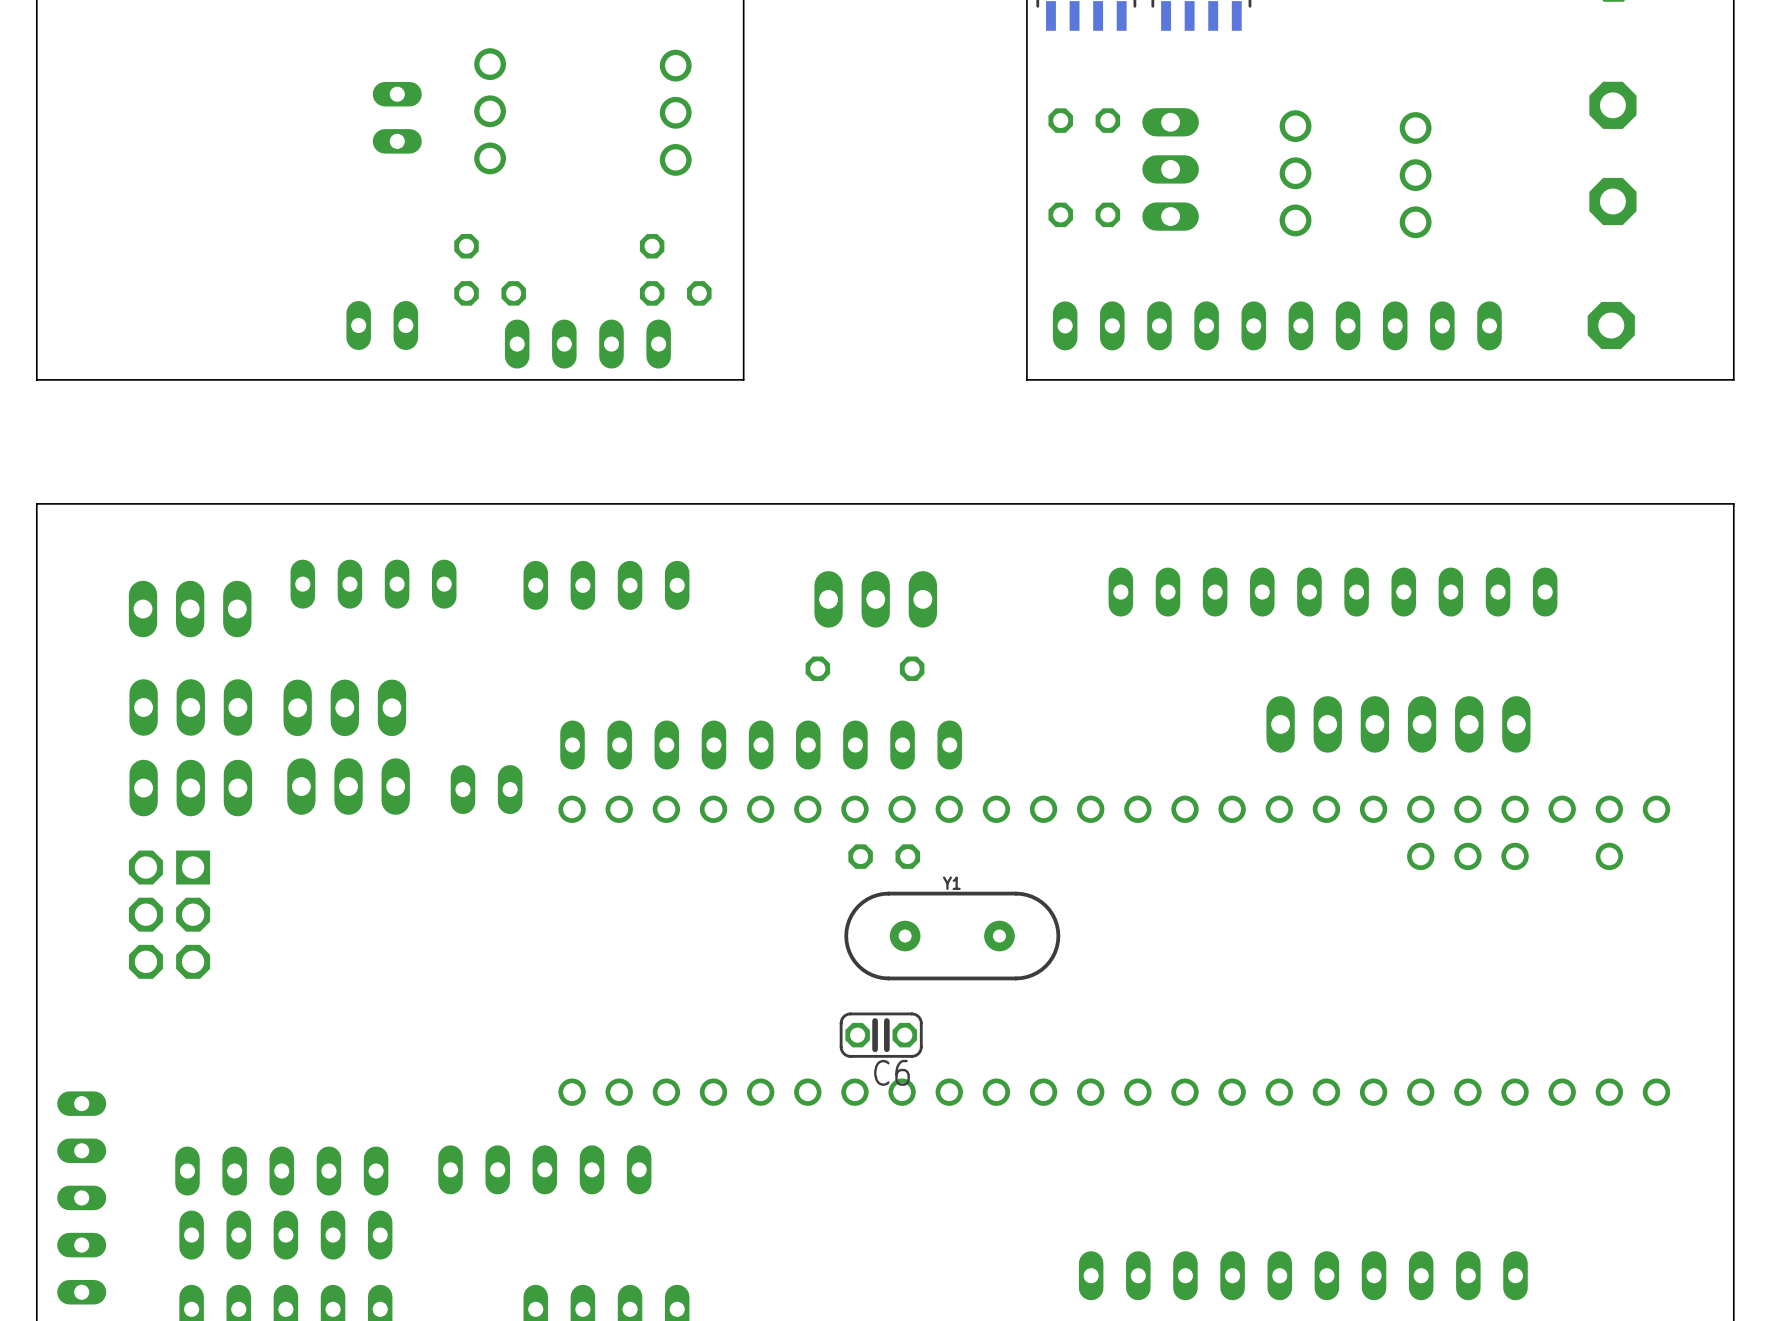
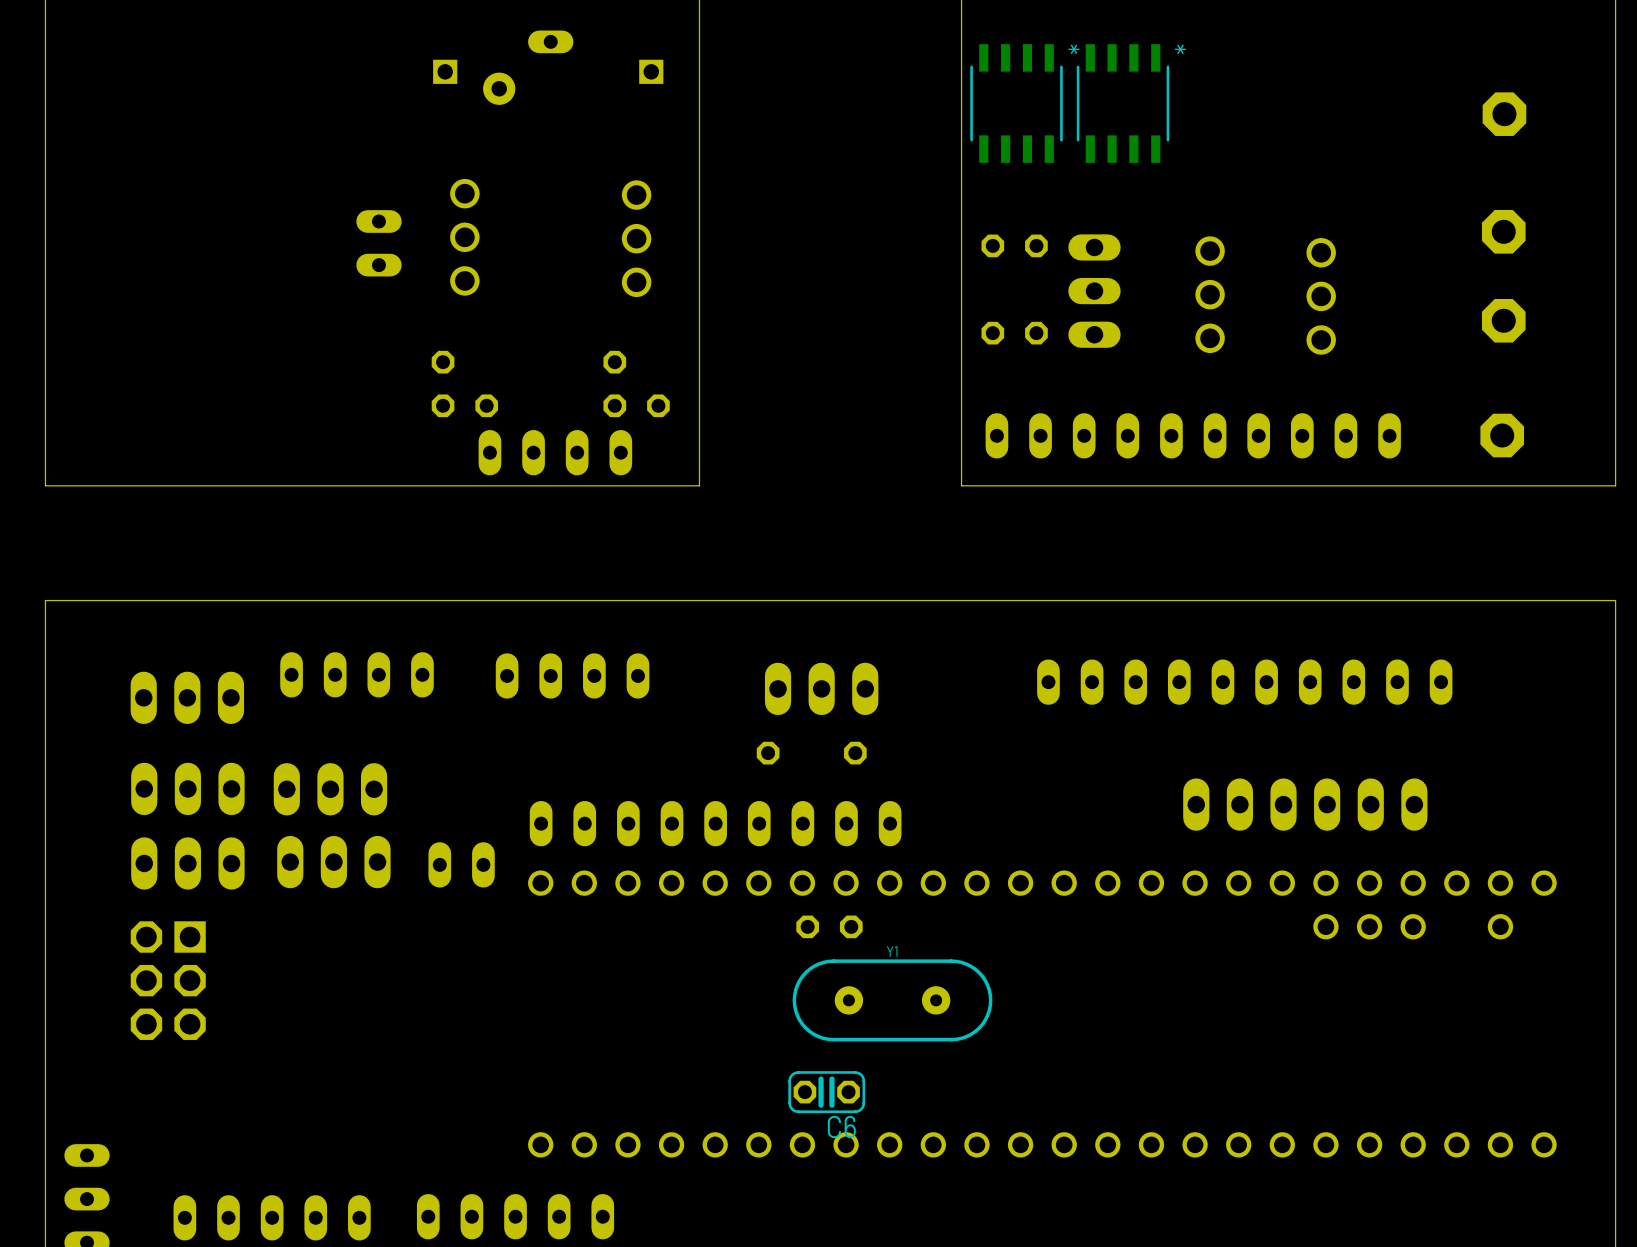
part: (382, 325) -> none

